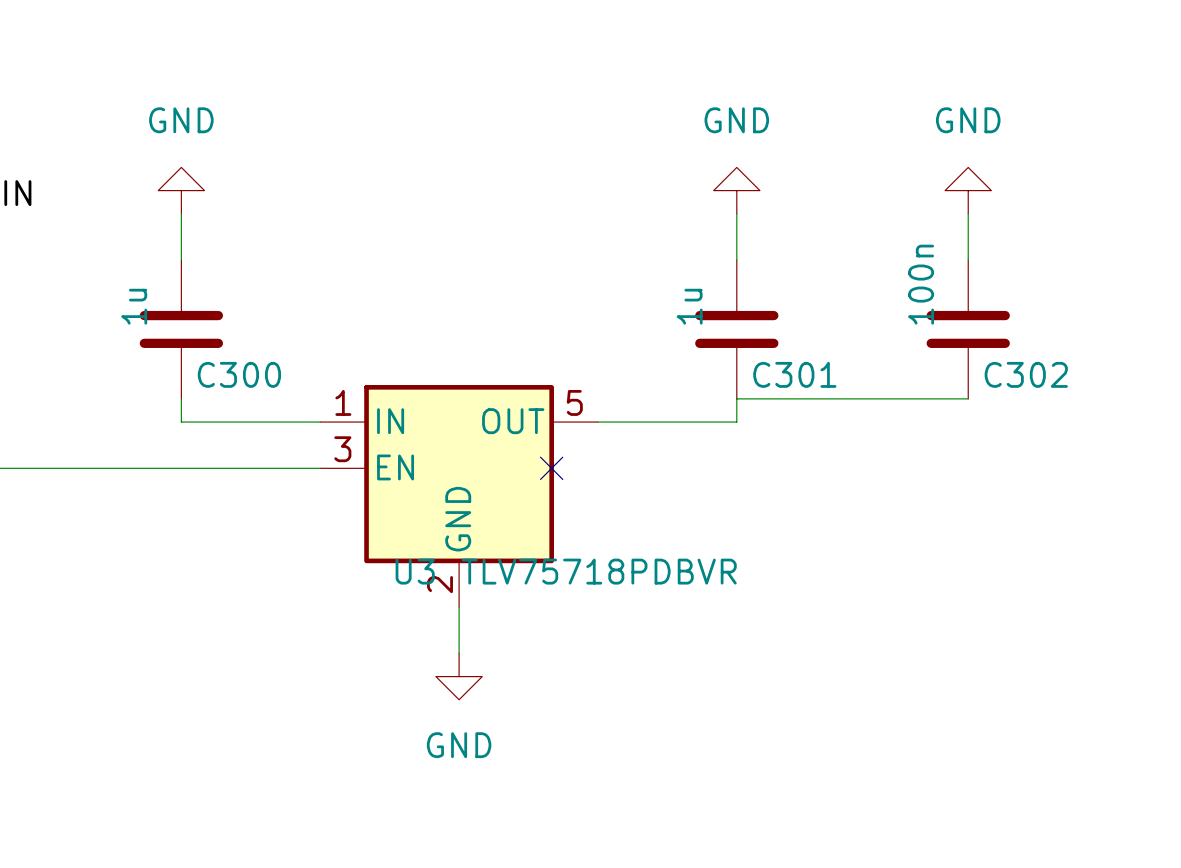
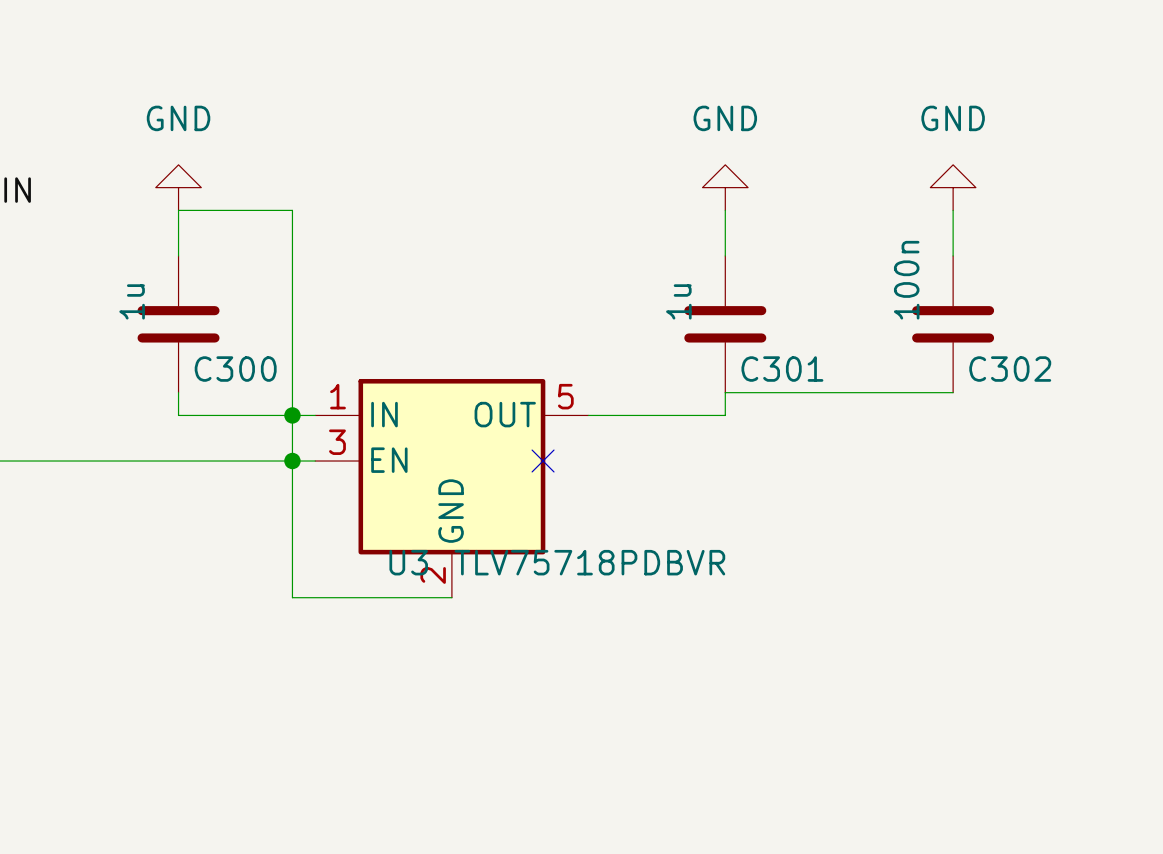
junction: none -> (292, 415)
junction: none -> (292, 461)
wire: (459, 607) (459, 653) -> (451, 597) (292, 597) (292, 210) (178, 210)
power symbol: GND (459, 676) -> none

